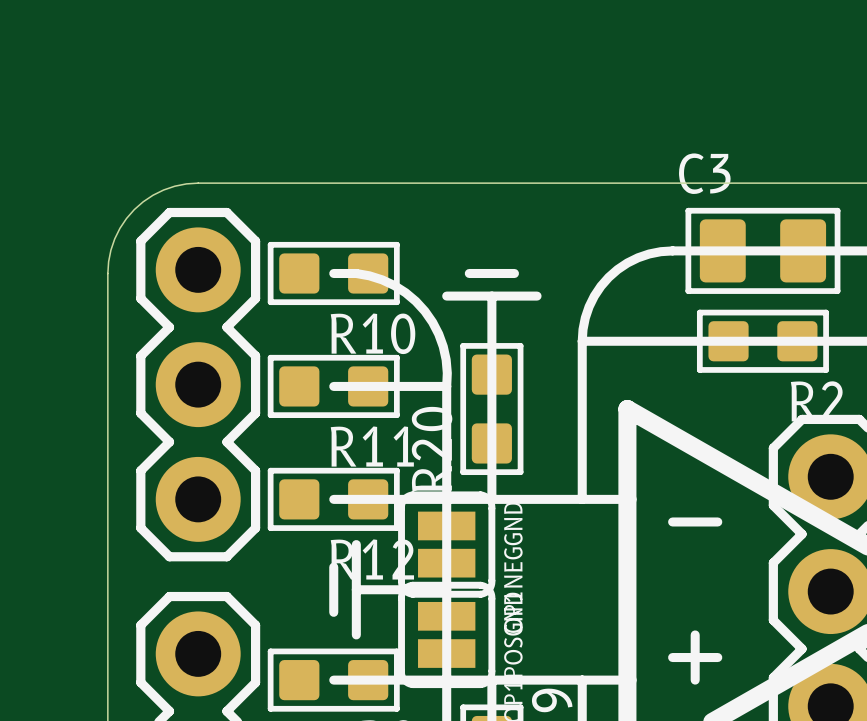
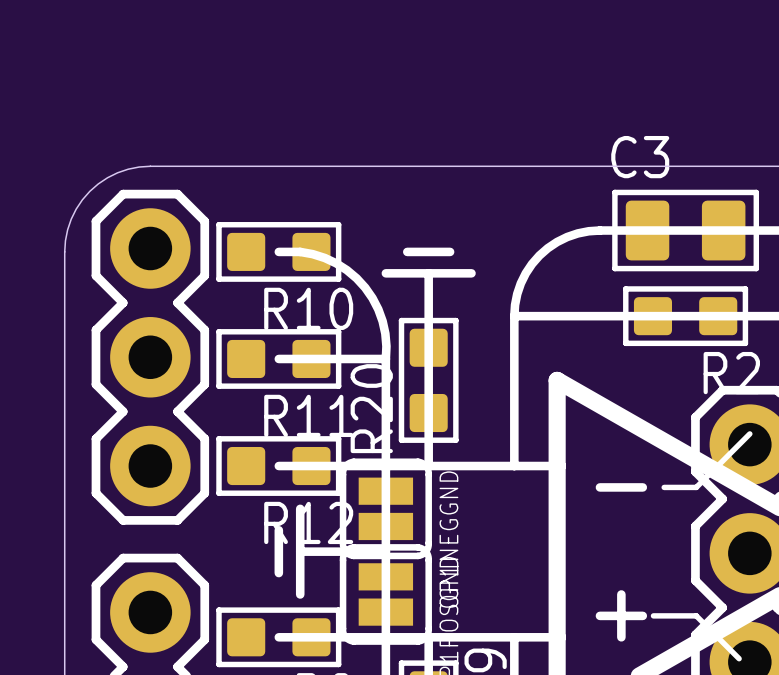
line: none -> (749, 433) (696, 487) (664, 487)
line: none -> (653, 615) (696, 615) (739, 658)

